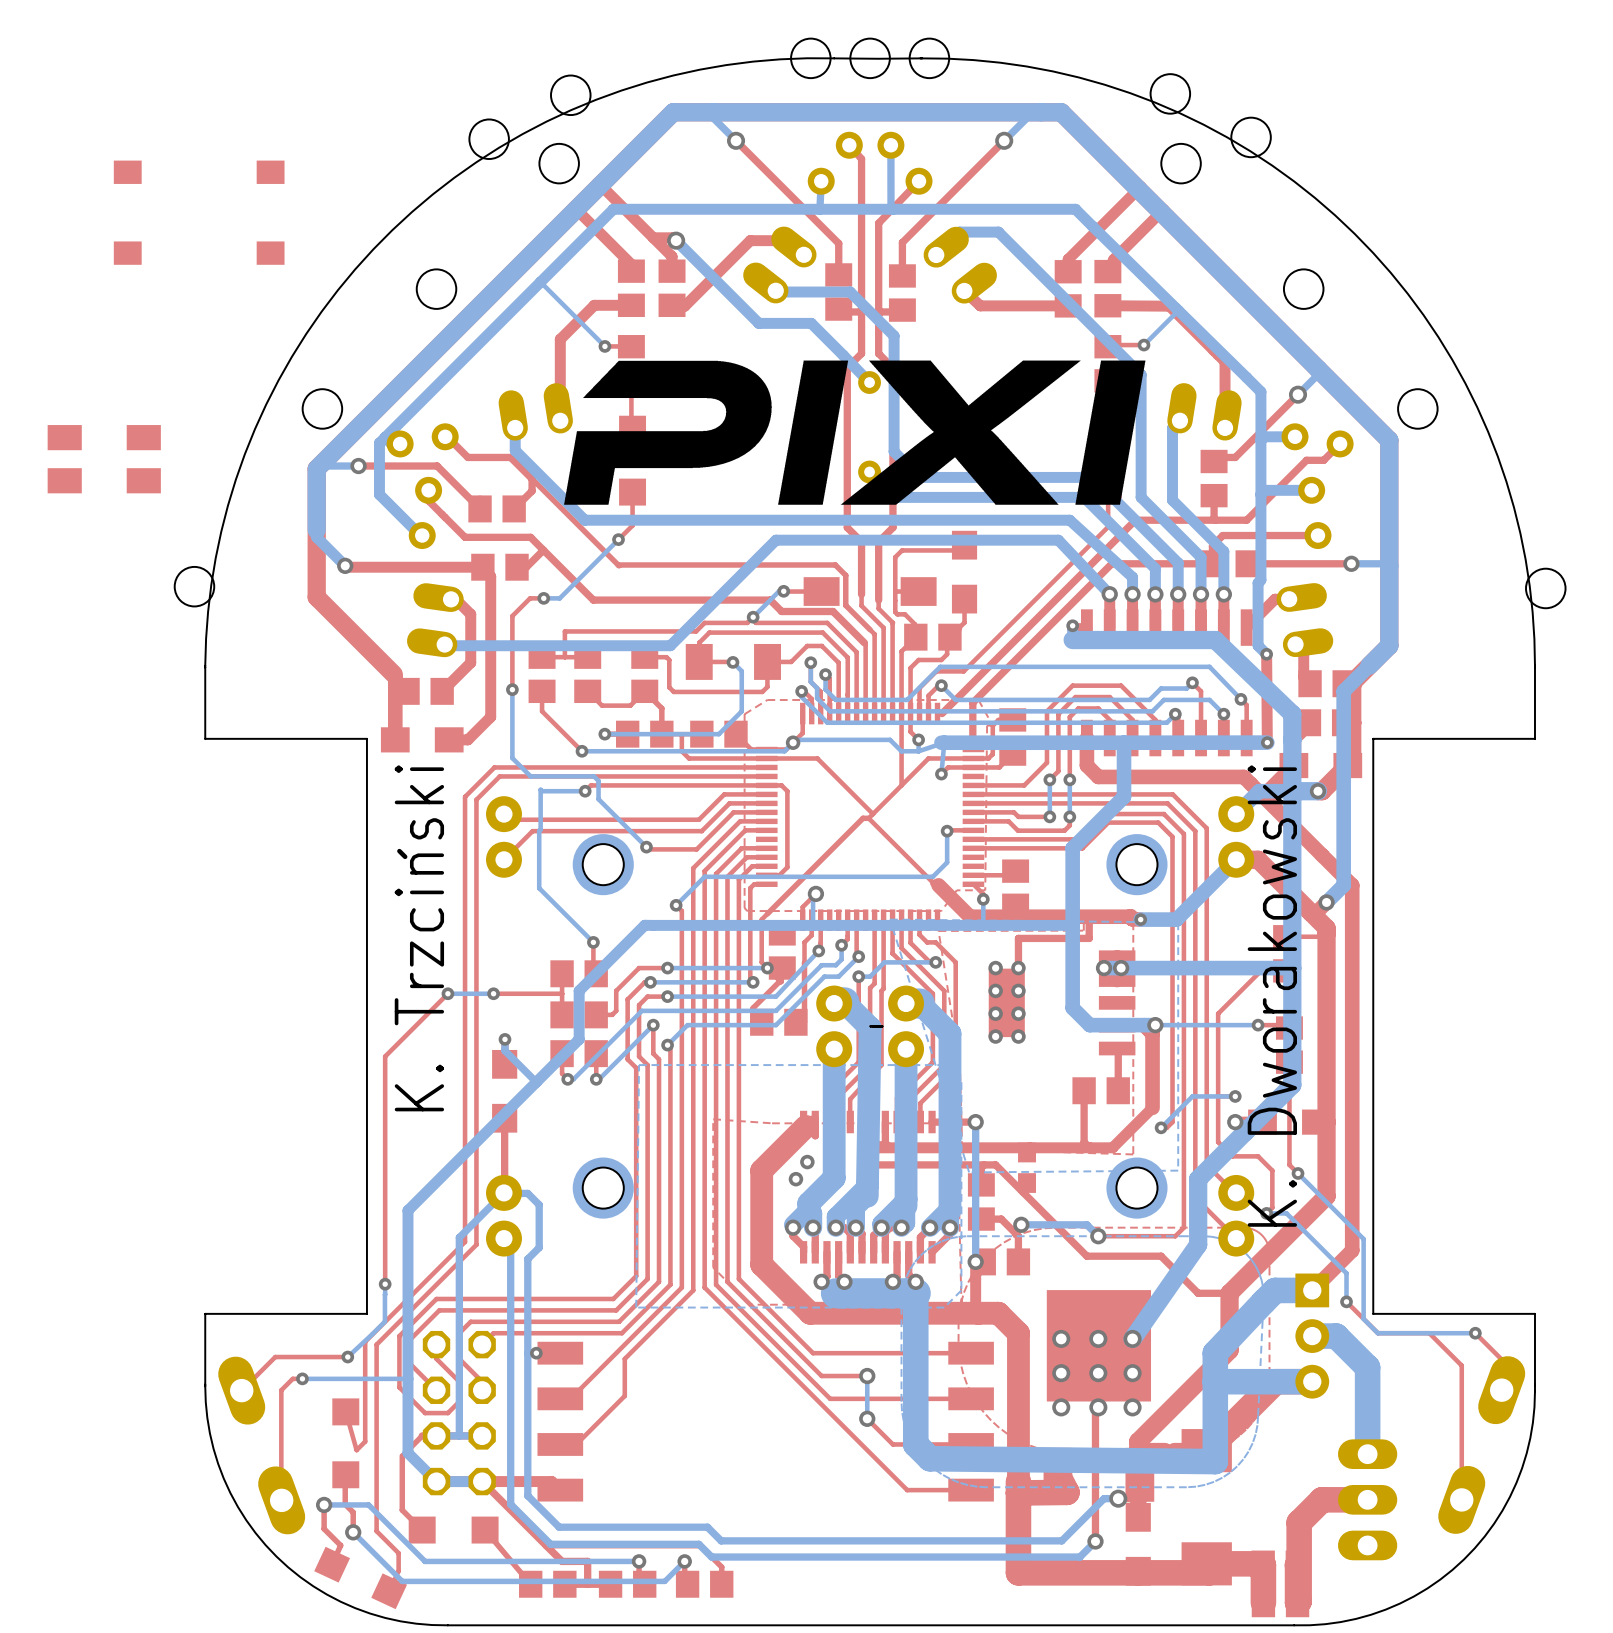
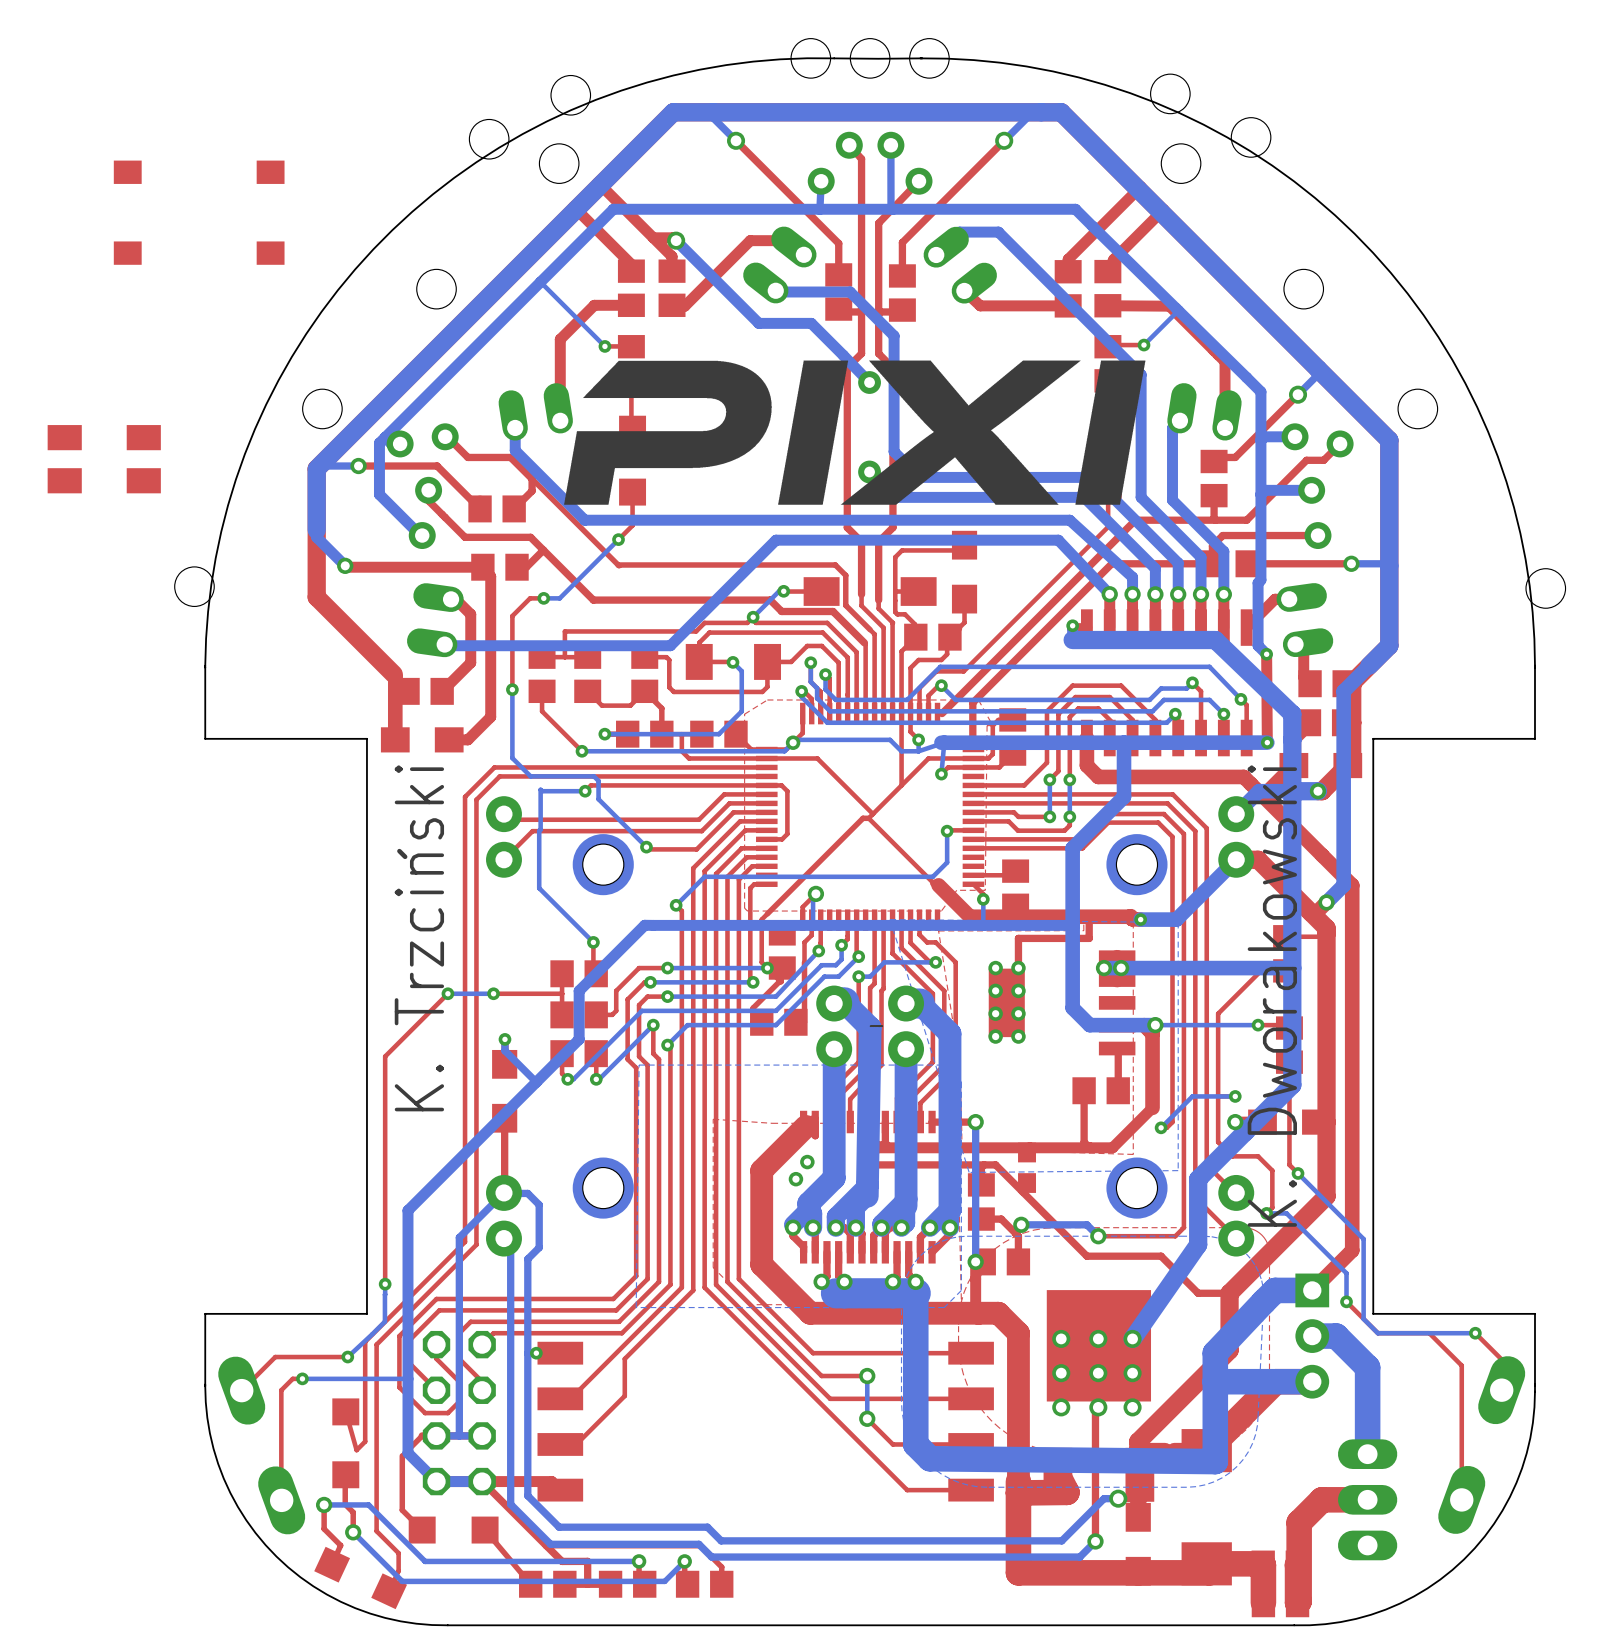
top track: (787, 834) (787, 867) (779, 875) (766, 875) -> (787, 834) (782, 839) (766, 839)

